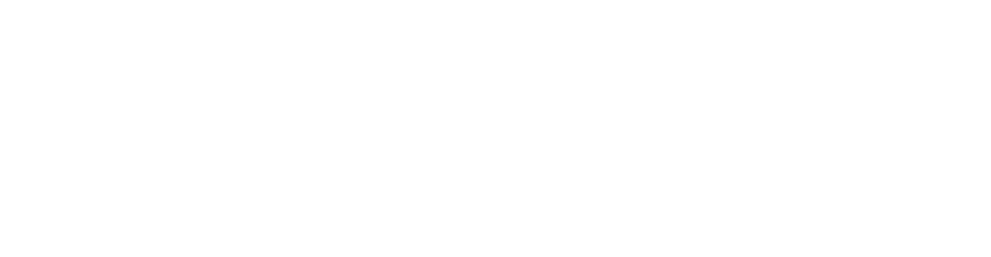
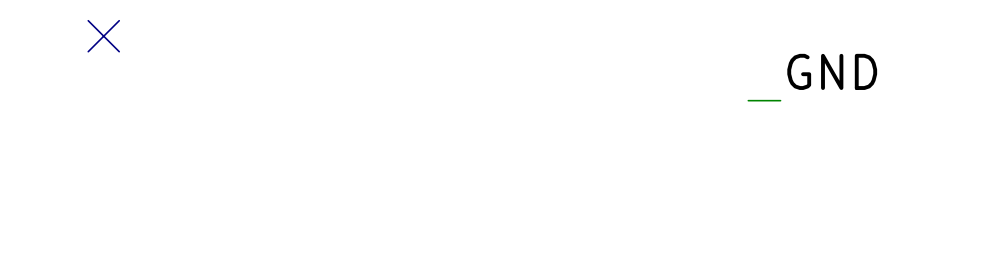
no-connect mark: none -> (103, 36)
label: none -> GND (832, 71)
wire: none -> (748, 100) (780, 100)

